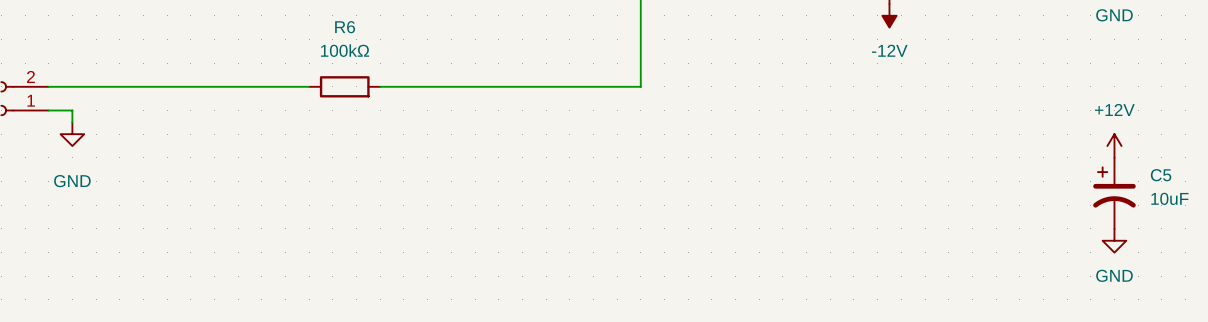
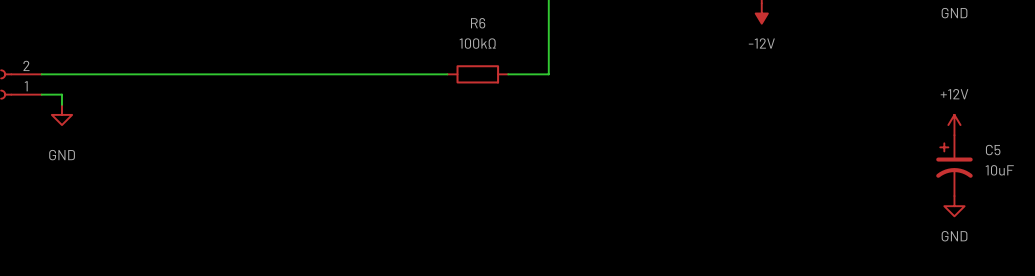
R6 position: (344, 86) -> (477, 74)
wire: (522, 86) (593, 86) -> (264, 74) (325, 74)

